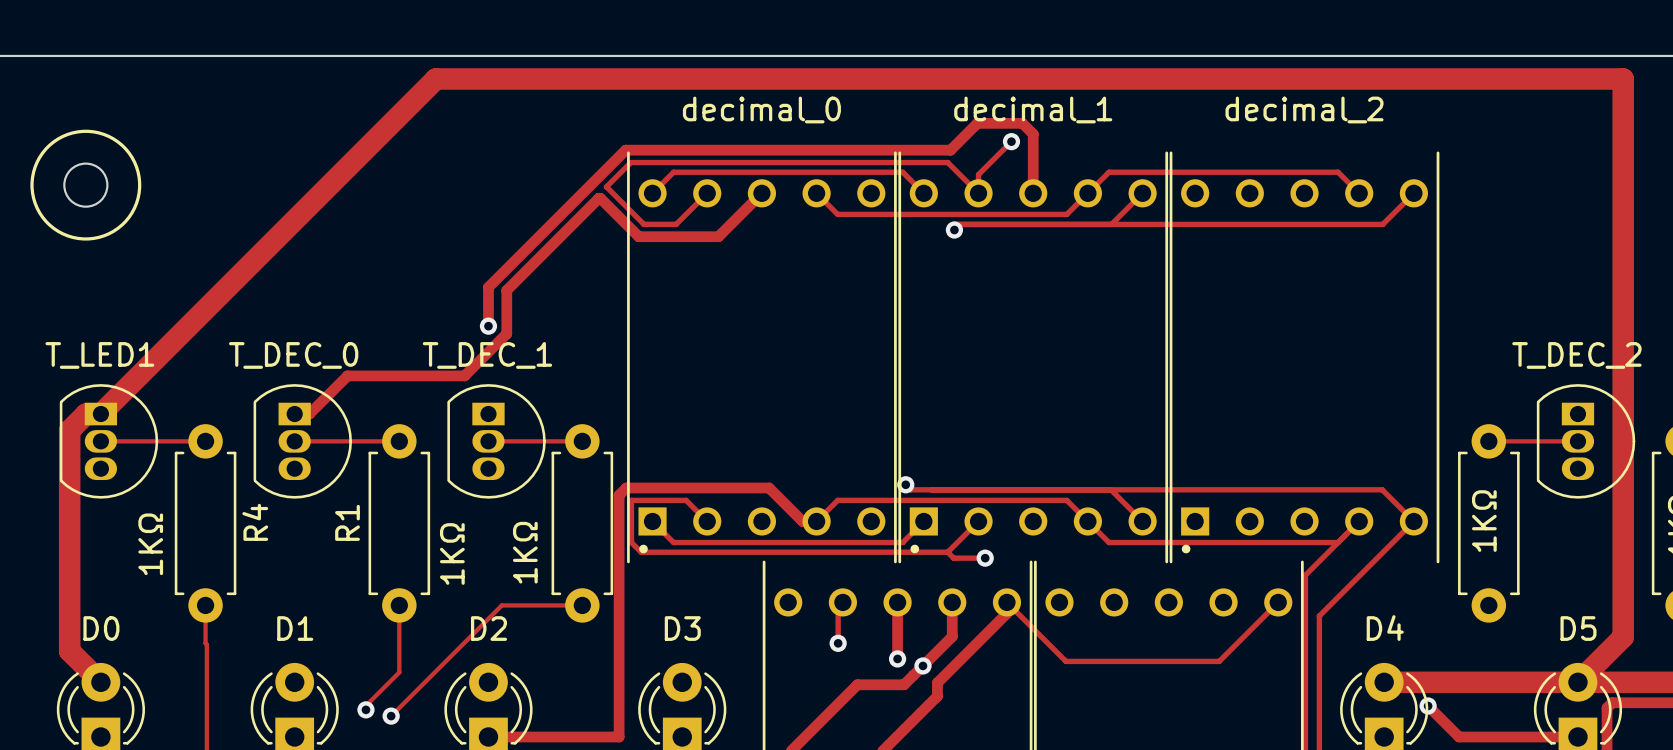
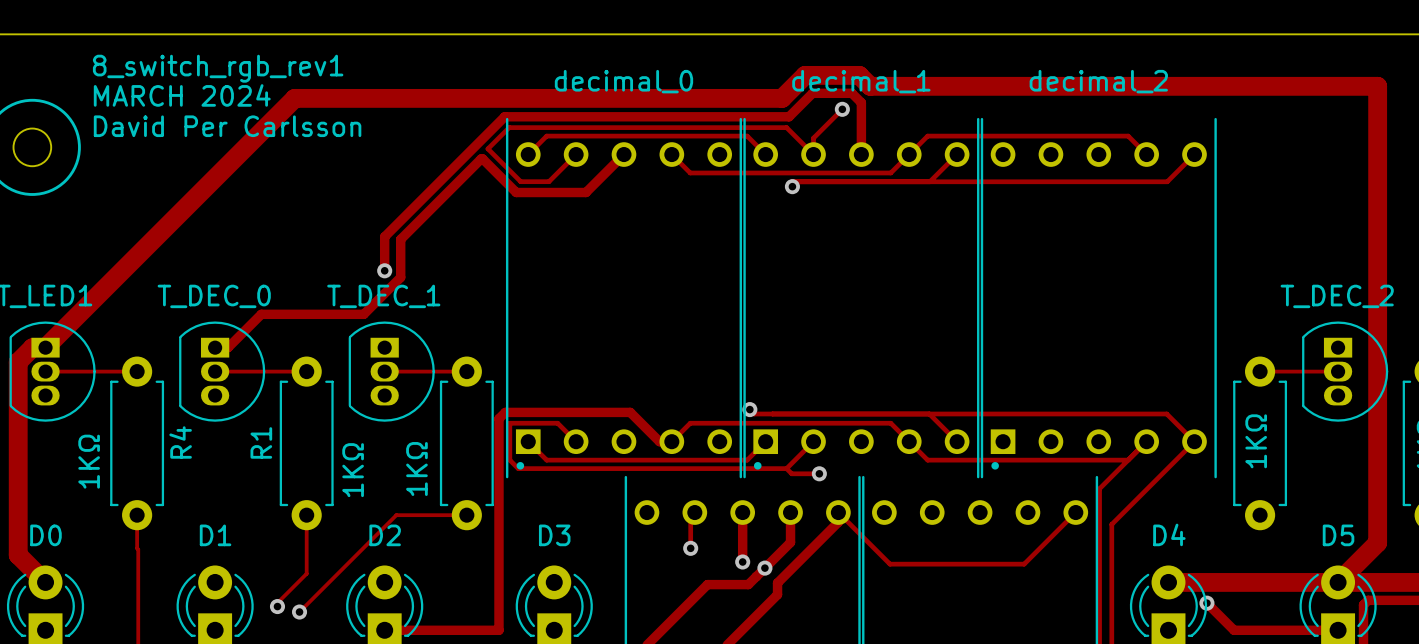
text: none -> 8_switch_rgb_rev1 (218, 68)
track: (1623, 115) (1623, 78) (435, 78) (385, 129) -> (1377, 86) (870, 86) (859, 75) (805, 75) (782, 98) (294, 98)
text: none -> MARCH 2024 (182, 95)
text: none -> David Per Carlsson (227, 126)

